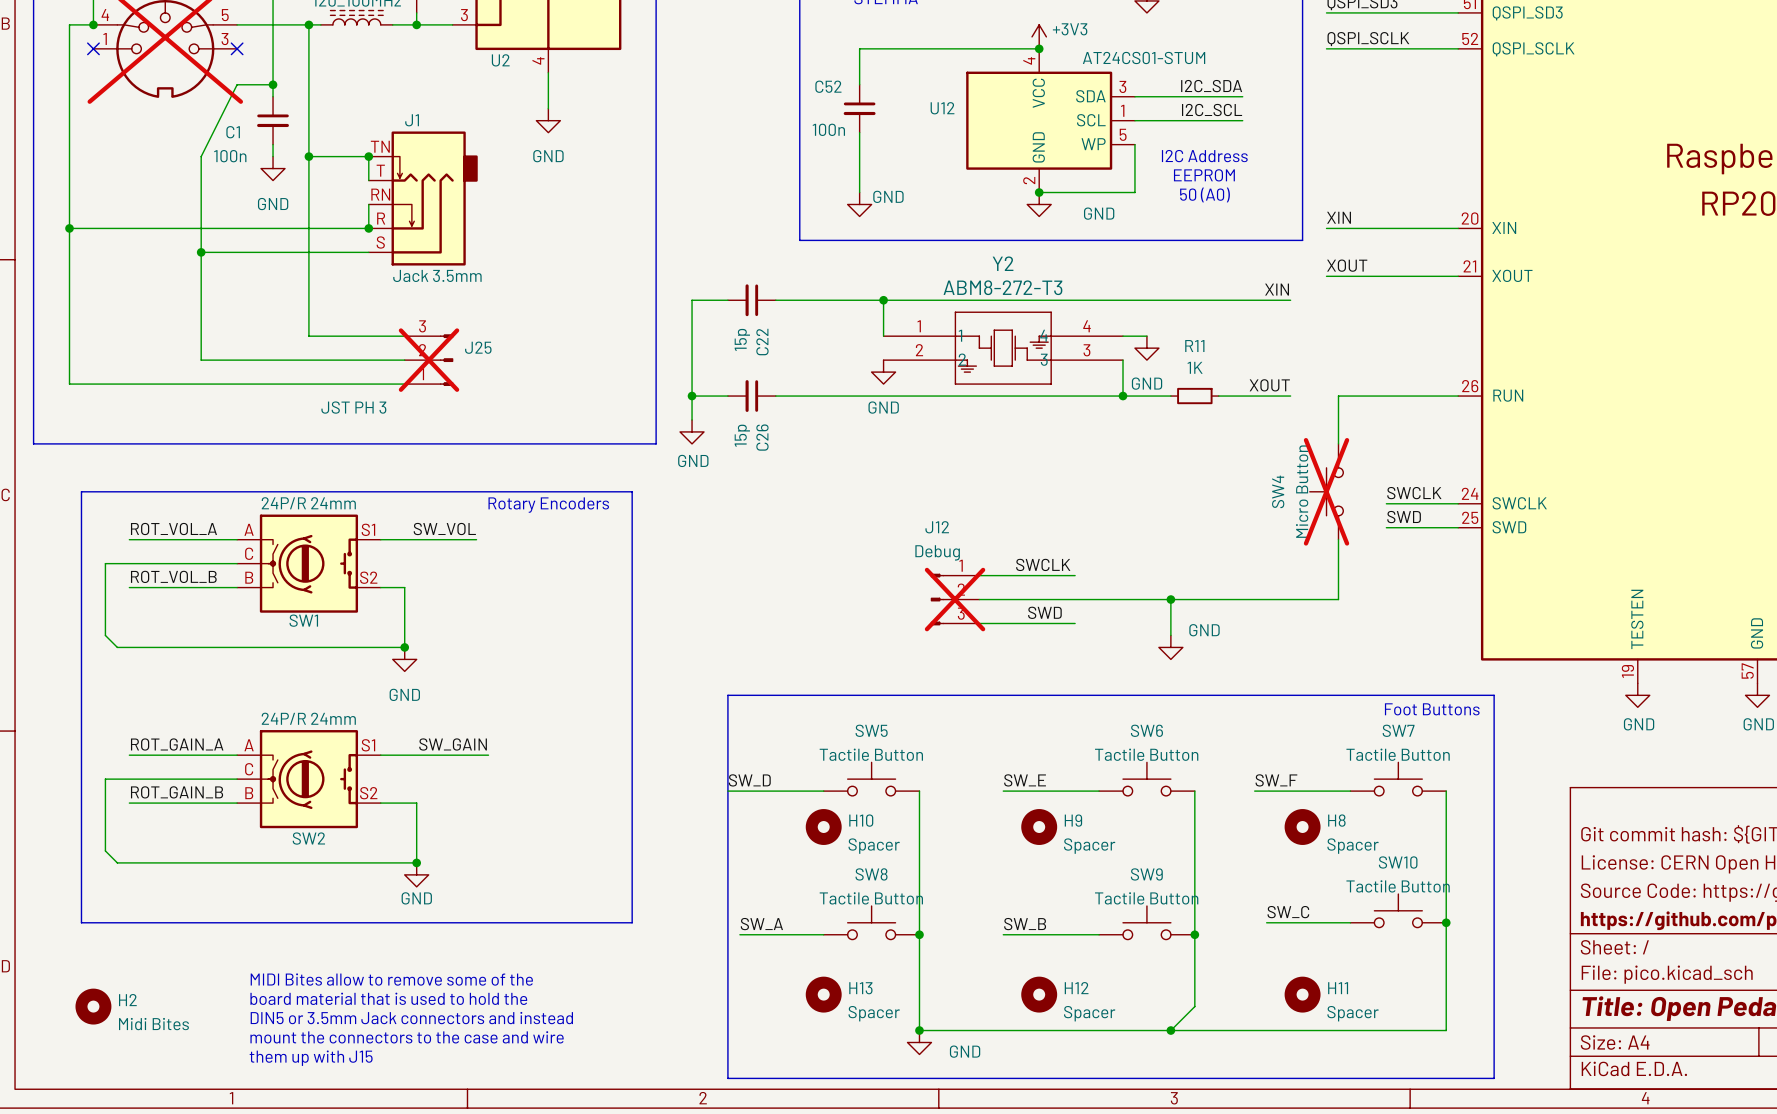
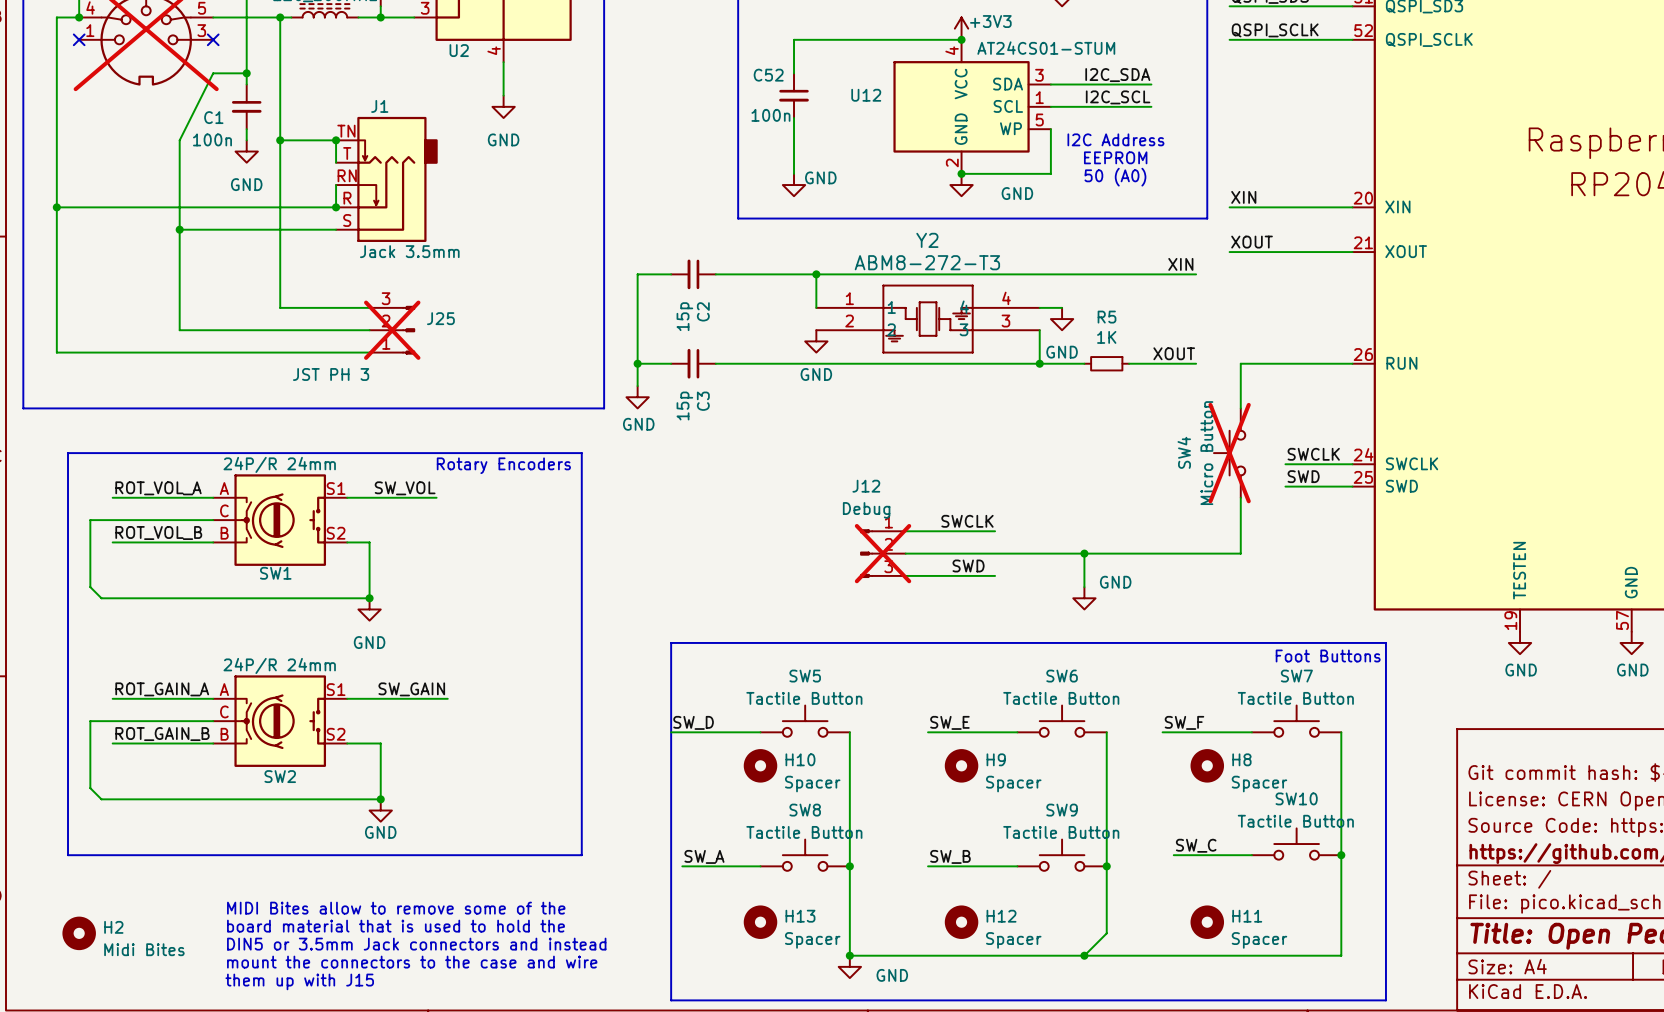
C22 name: C22 (762, 342) -> C2 (703, 311)
R11 name: R11 (1194, 346) -> R5 (1107, 317)
C26 name: C26 (762, 437) -> C3 (703, 401)

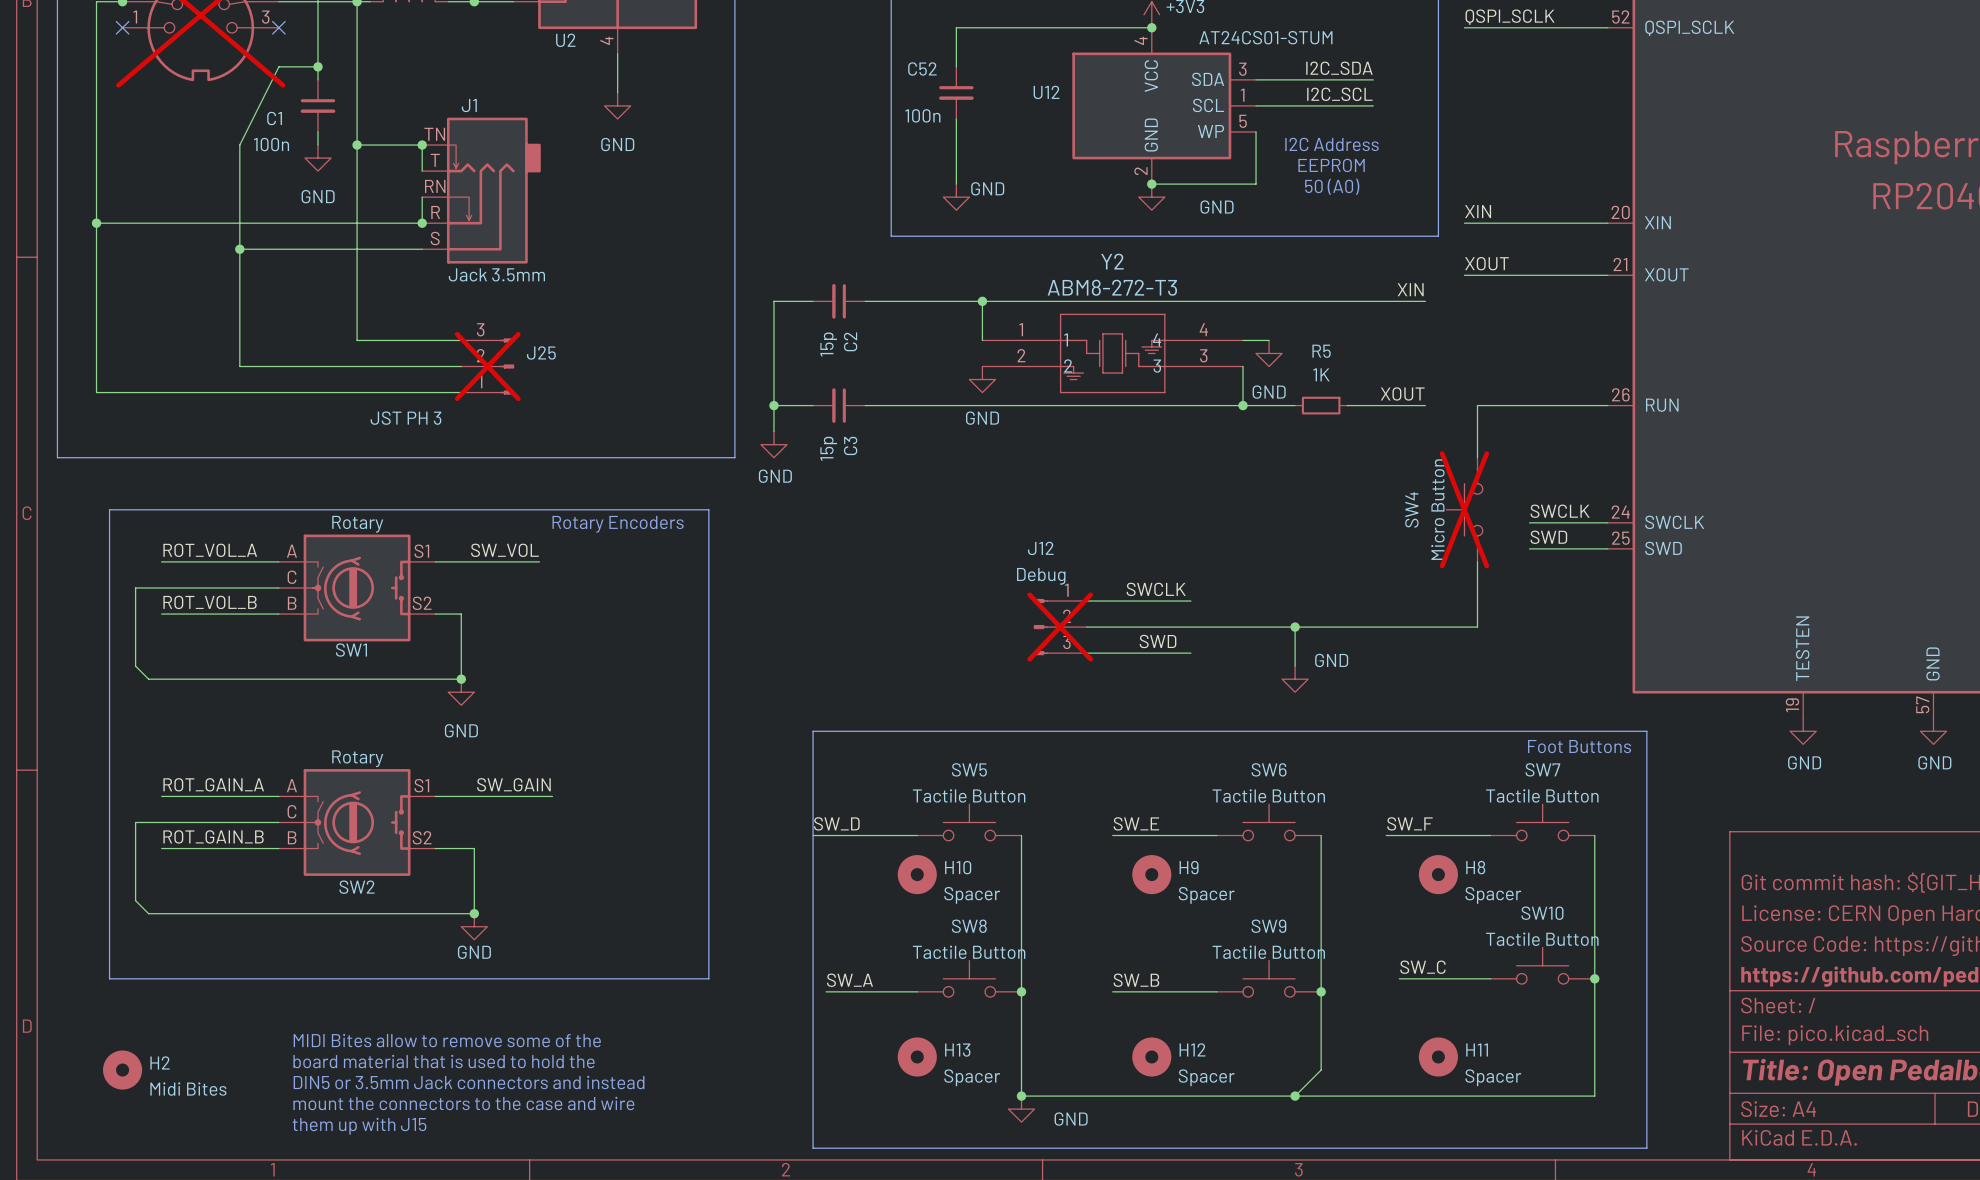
SW1 value: 24P/R 24mm (279, 464) -> Rotary (357, 524)
SW2 value: 24P/R 24mm (279, 665) -> Rotary (357, 758)

